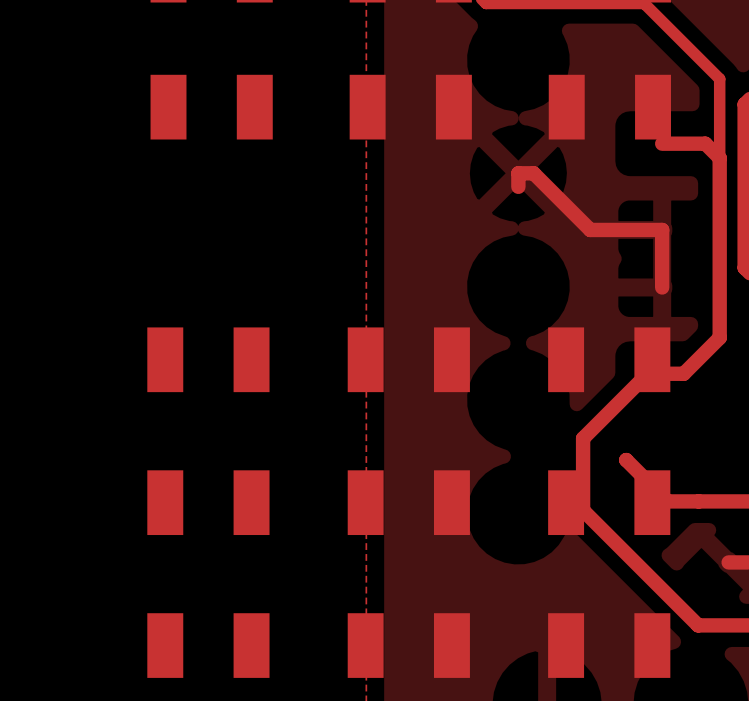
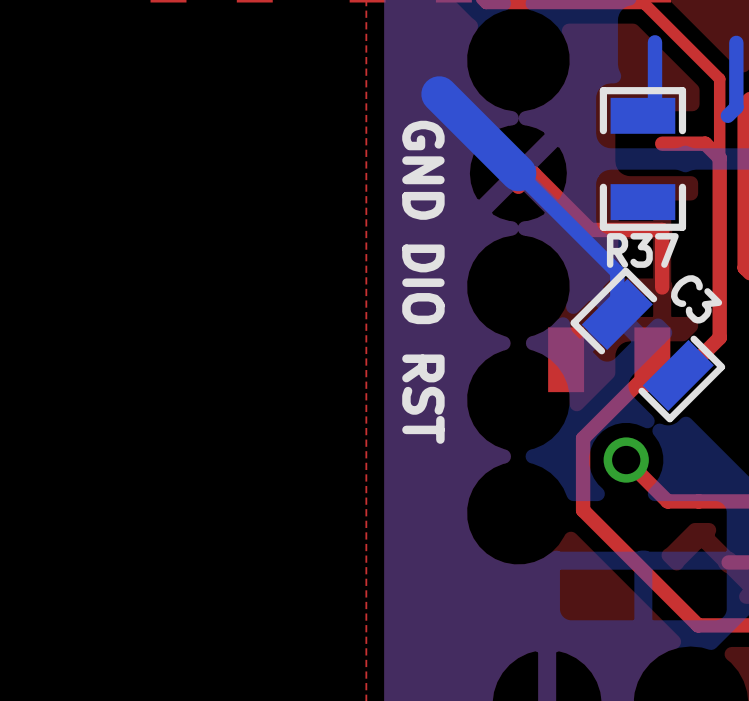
bottom track: none -> (654, 42) (654, 103) (642, 115)
bottom track: none -> (736, 42) (736, 107) (727, 115)
bottom track: none -> (439, 94) (617, 272) (617, 314)
part: (211, 107) -> none
part: (410, 107) -> none
part: (609, 107) -> none
R37: none -> (642, 158)
text: none -> GND (423, 170)
text: none -> DIO (423, 284)
C3: none -> (647, 345)
part: (208, 359) -> none
part: (408, 359) -> none
text: none -> RST (423, 399)
via: none -> (626, 460)
part: (208, 502) -> none
part: (408, 502) -> none
part: (609, 502) -> none
part: (208, 645) -> none
part: (408, 645) -> none
part: (609, 645) -> none

